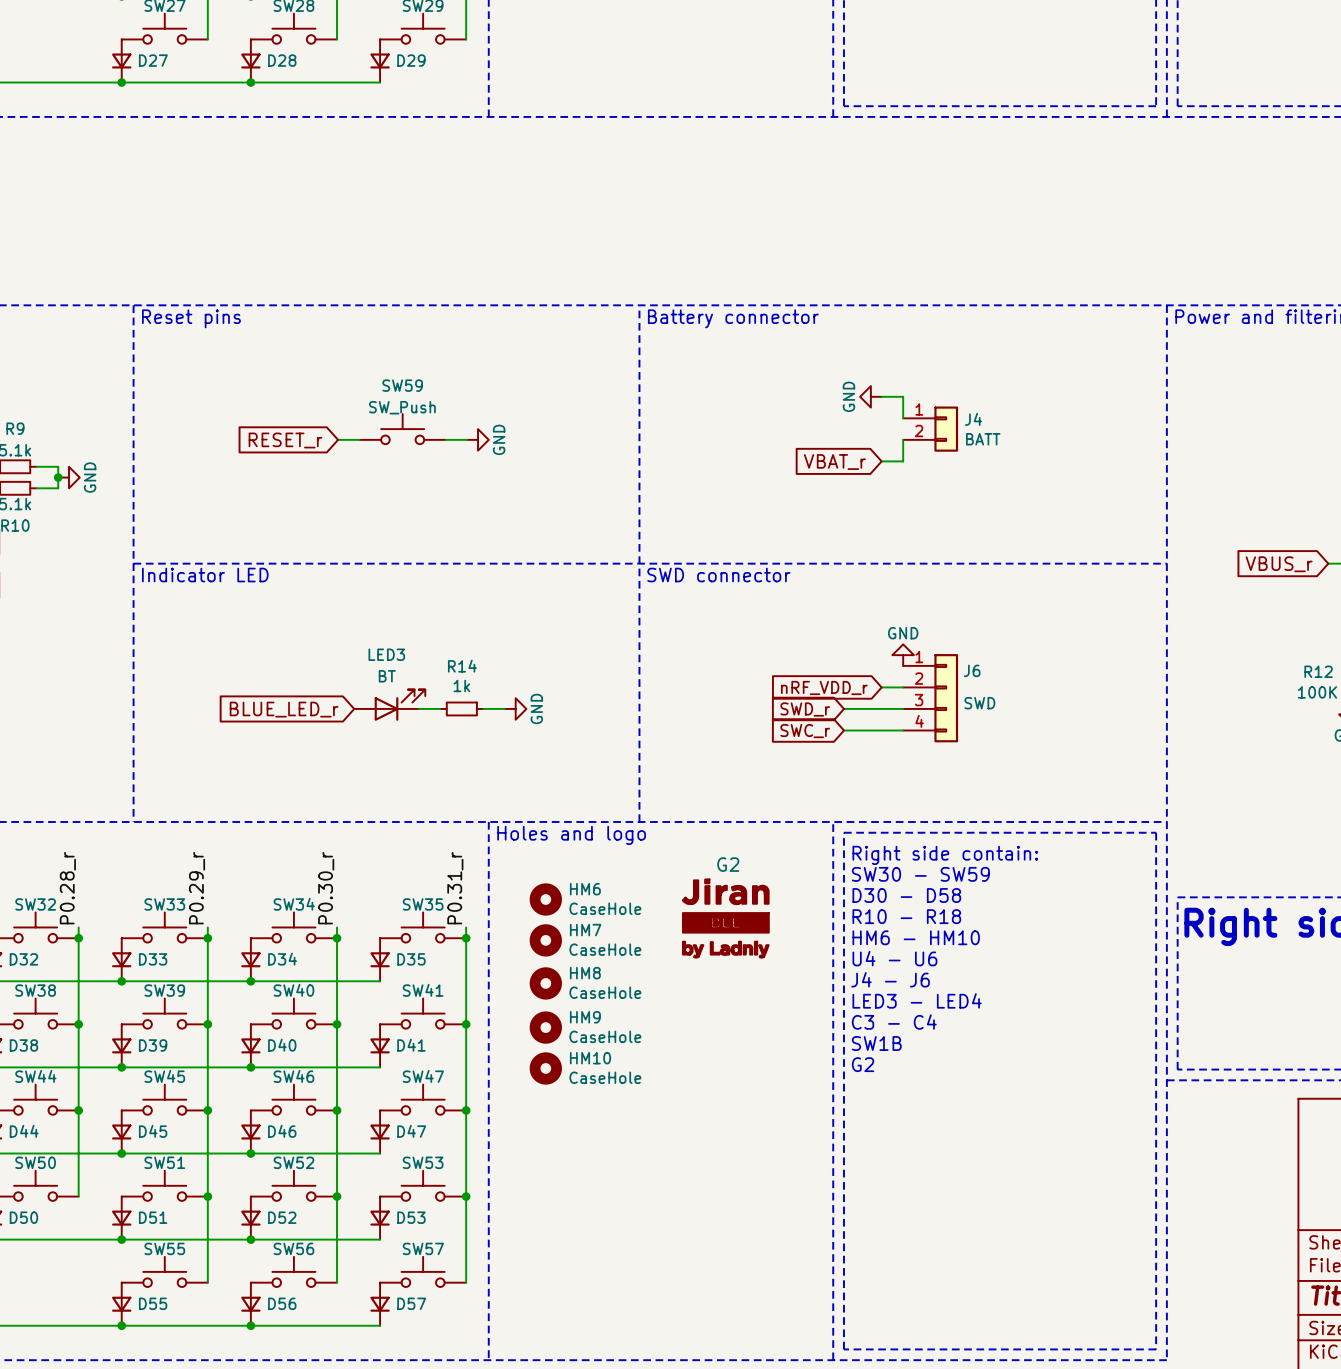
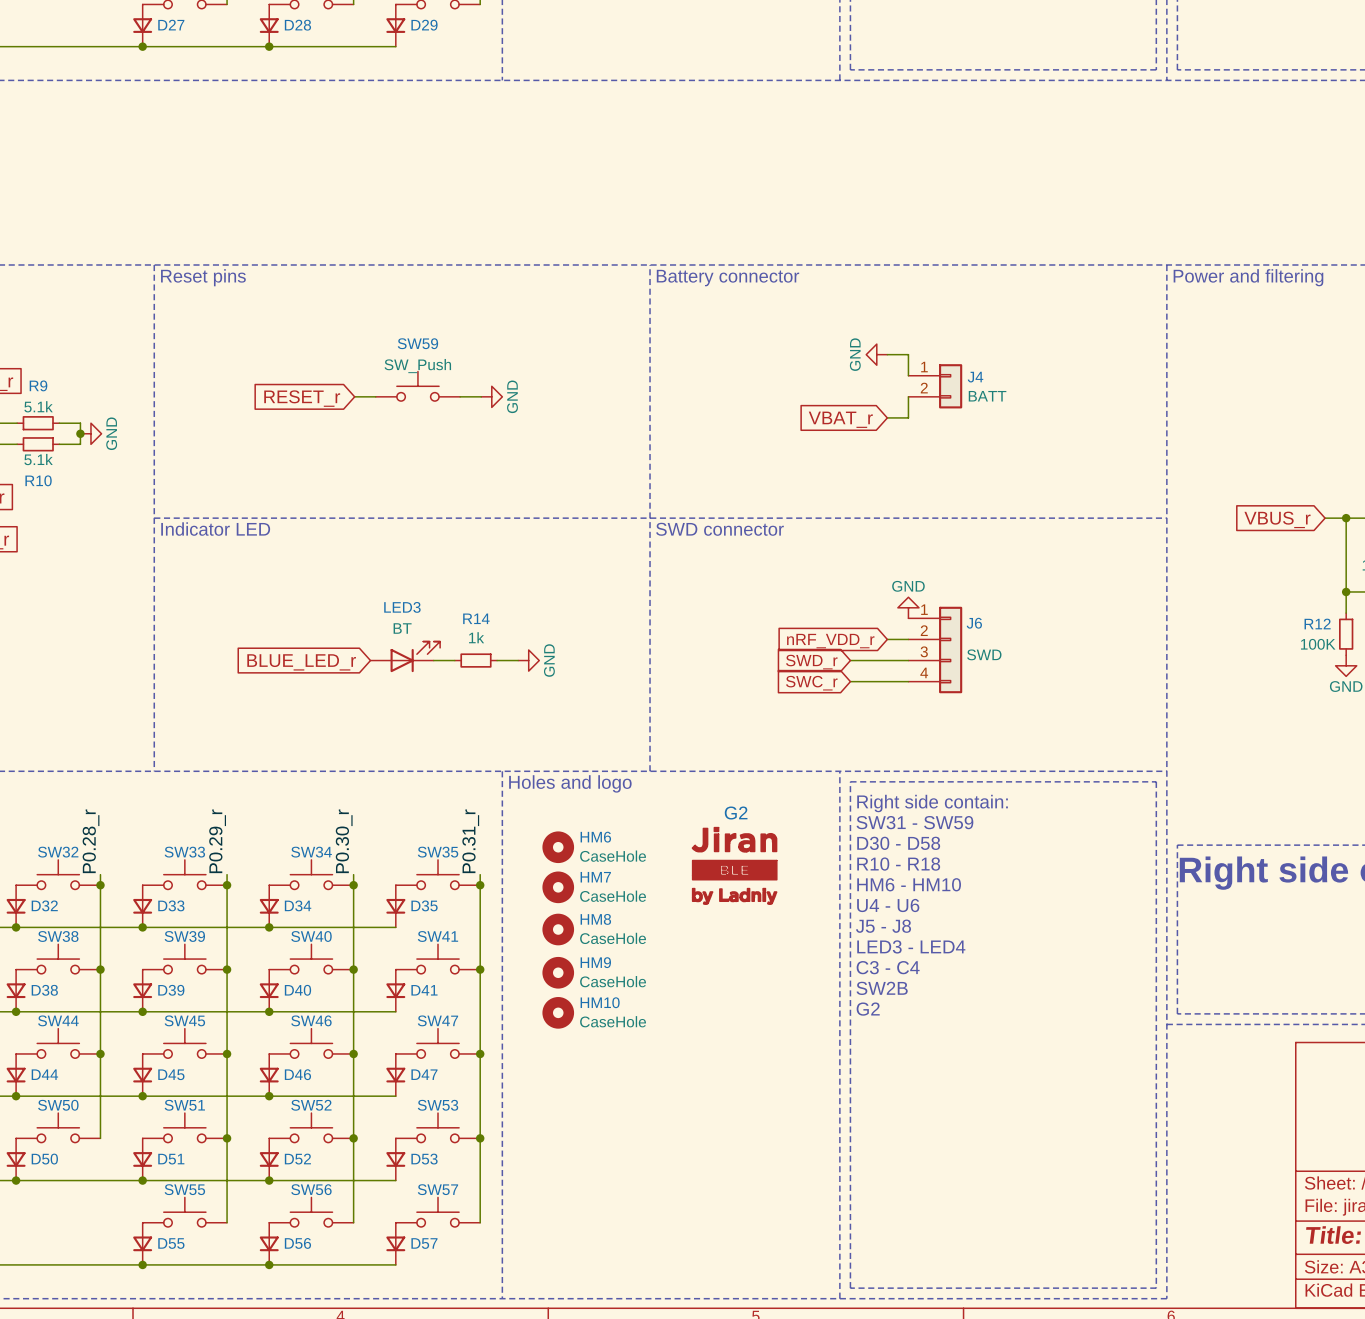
text: SW30 - SW59 (920, 874) -> SW31 - SW59 (914, 822)
text: J4 - J6 (890, 979) -> J5 - J8 (883, 926)
text: SW1B (876, 1043) -> SW2B (882, 988)

